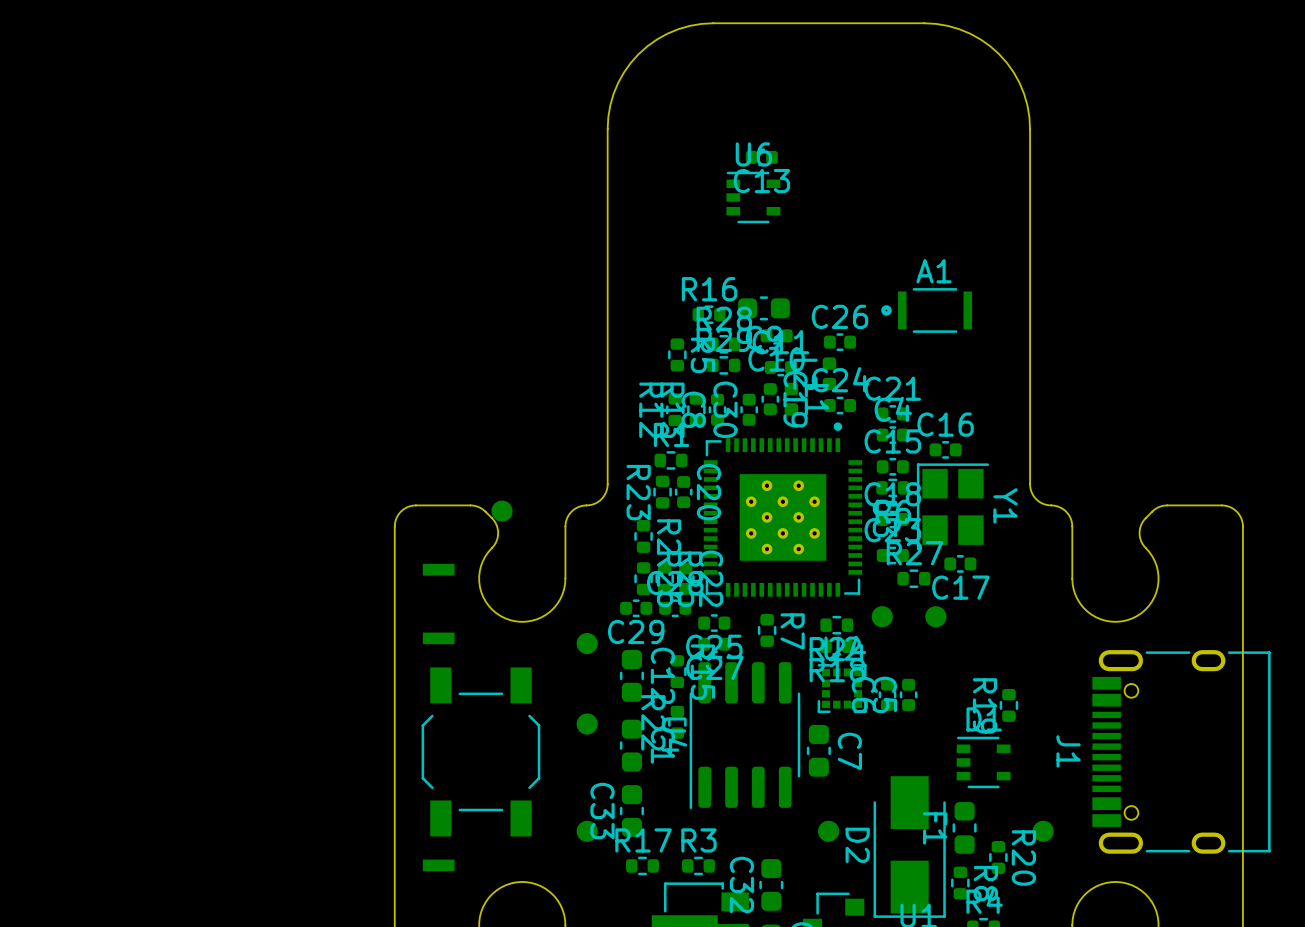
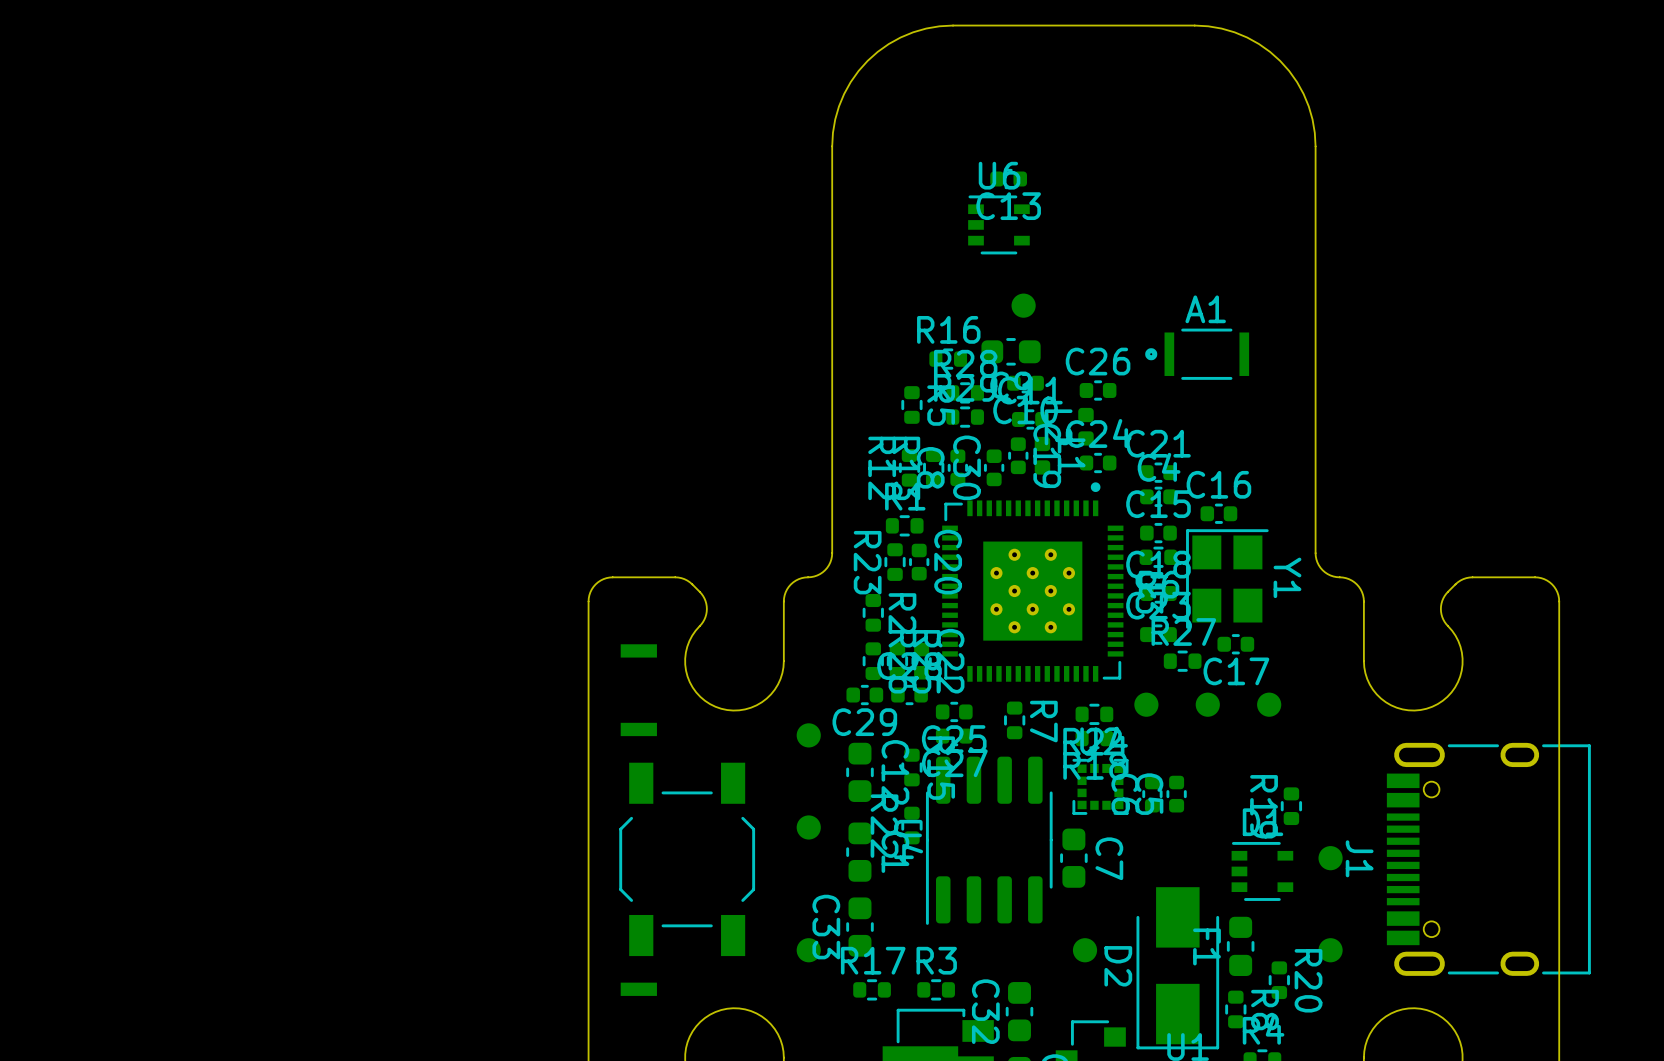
part: none -> (1023, 305)
part: (502, 511) -> none
part: none -> (1269, 704)
part: none -> (1330, 858)

